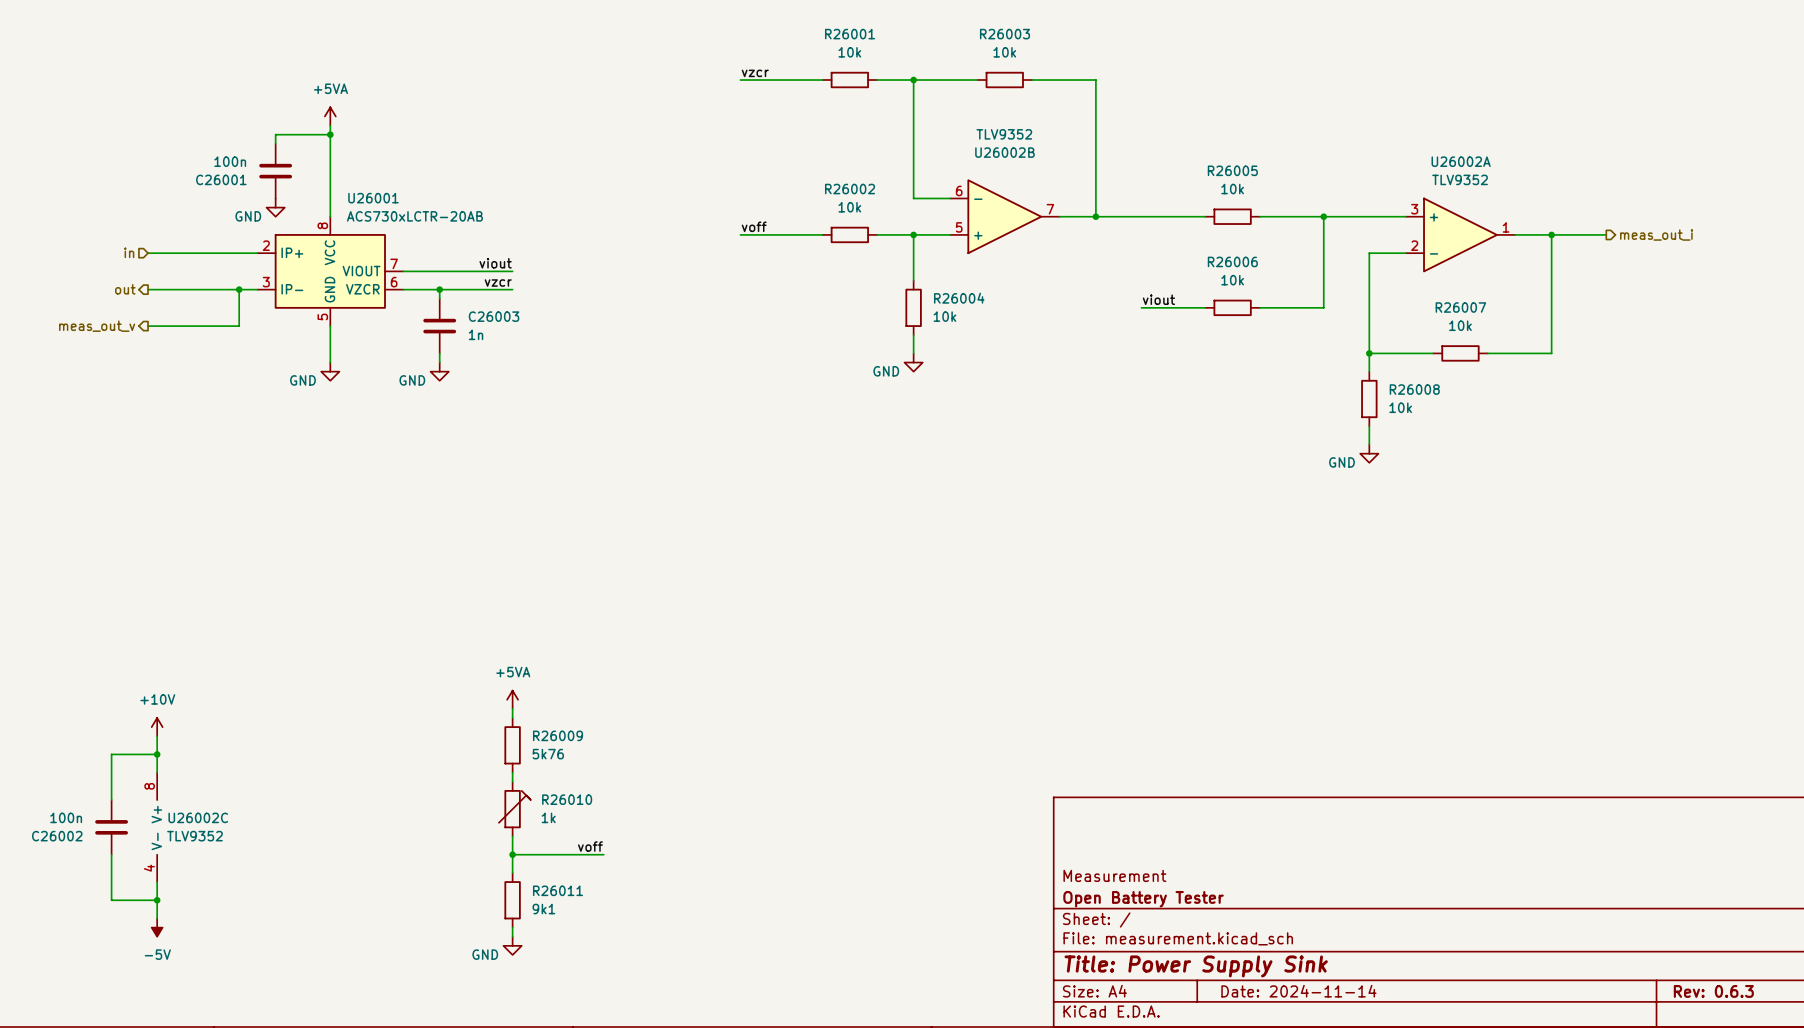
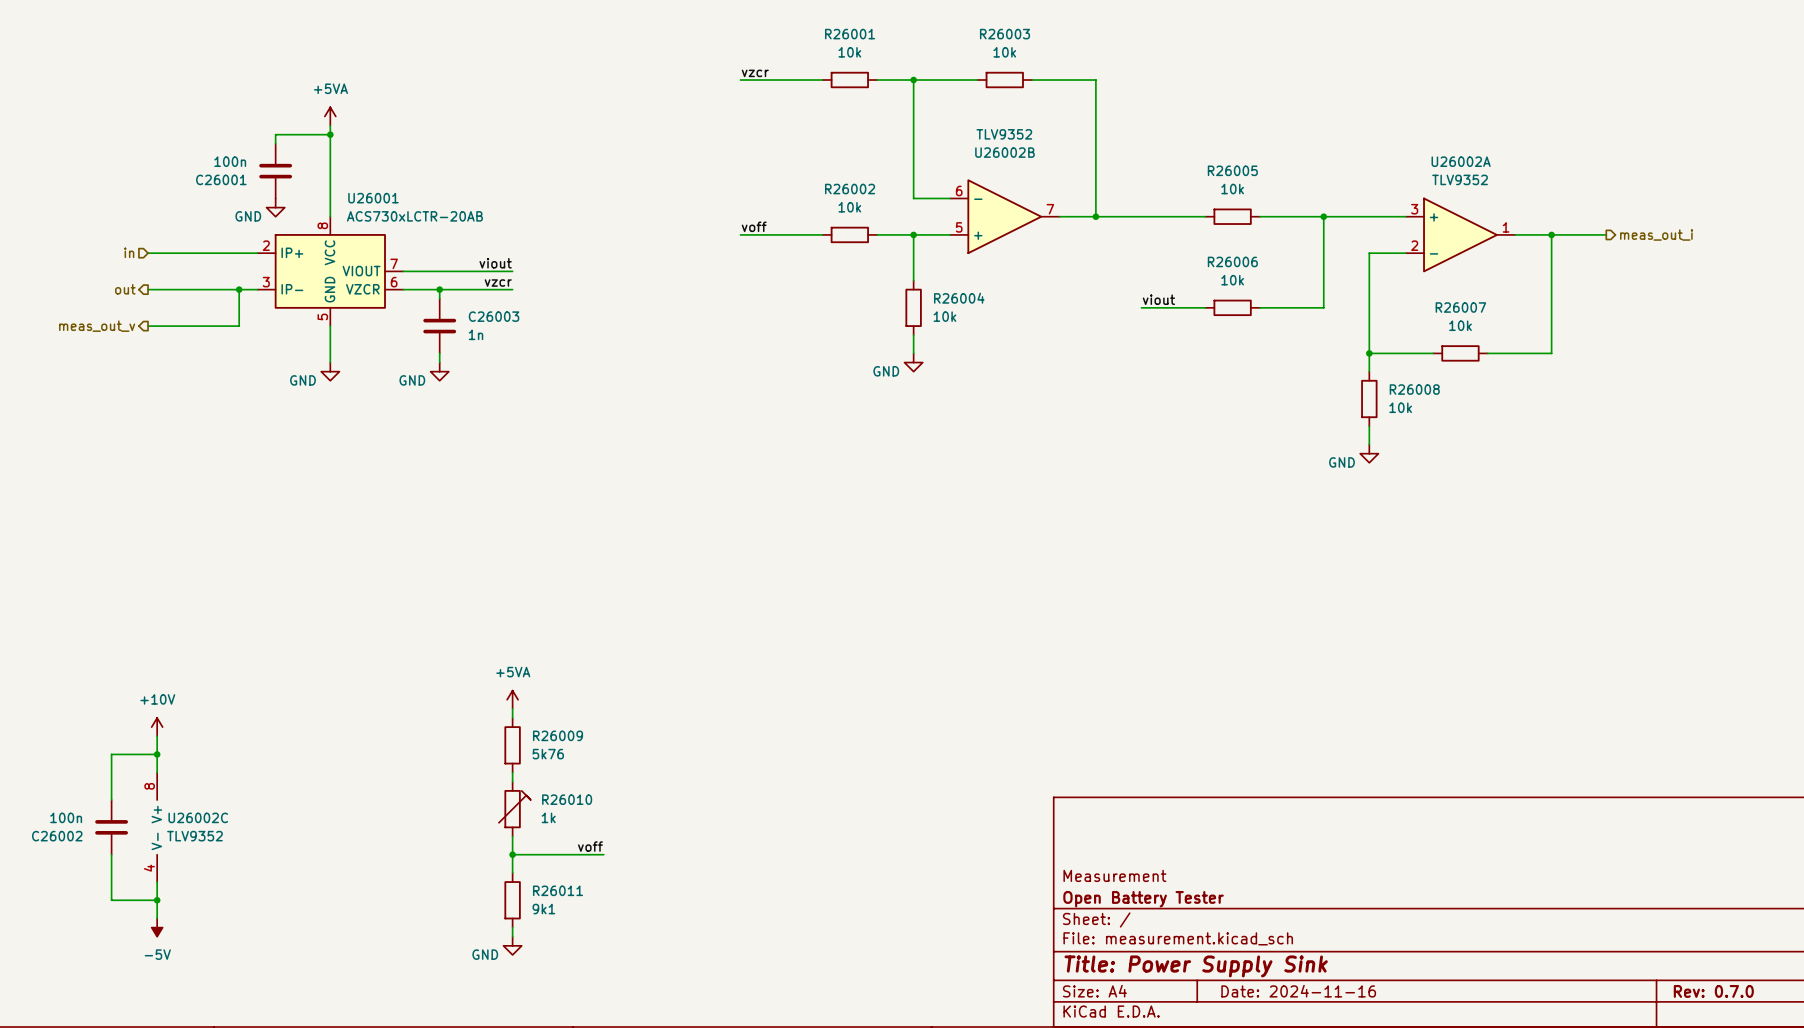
title block: Date: 2024-11-14 (1298, 991) -> Date: 2024-11-16 (1298, 991)
title block: Rev: 0.6.3 (1713, 991) -> Rev: 0.7.0 (1713, 991)

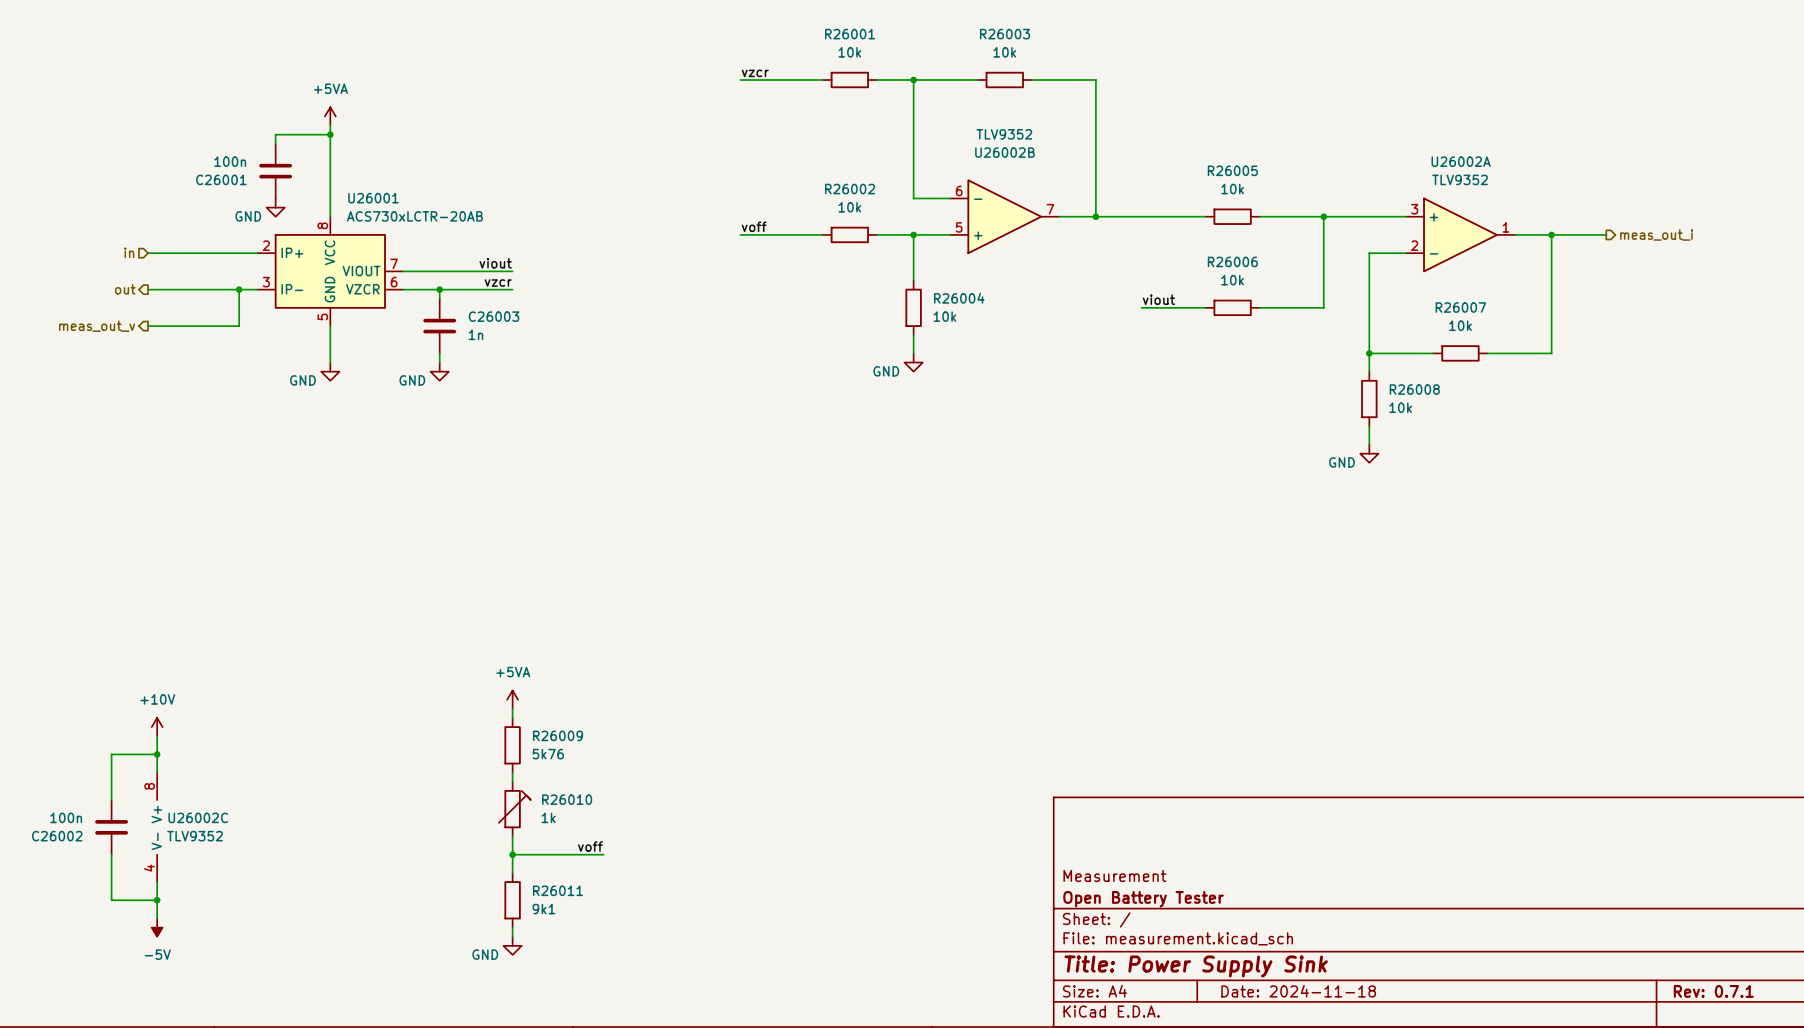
title block: Date: 2024-11-16 (1298, 991) -> Date: 2024-11-18 (1298, 991)
title block: Rev: 0.7.0 (1713, 991) -> Rev: 0.7.1 (1713, 991)

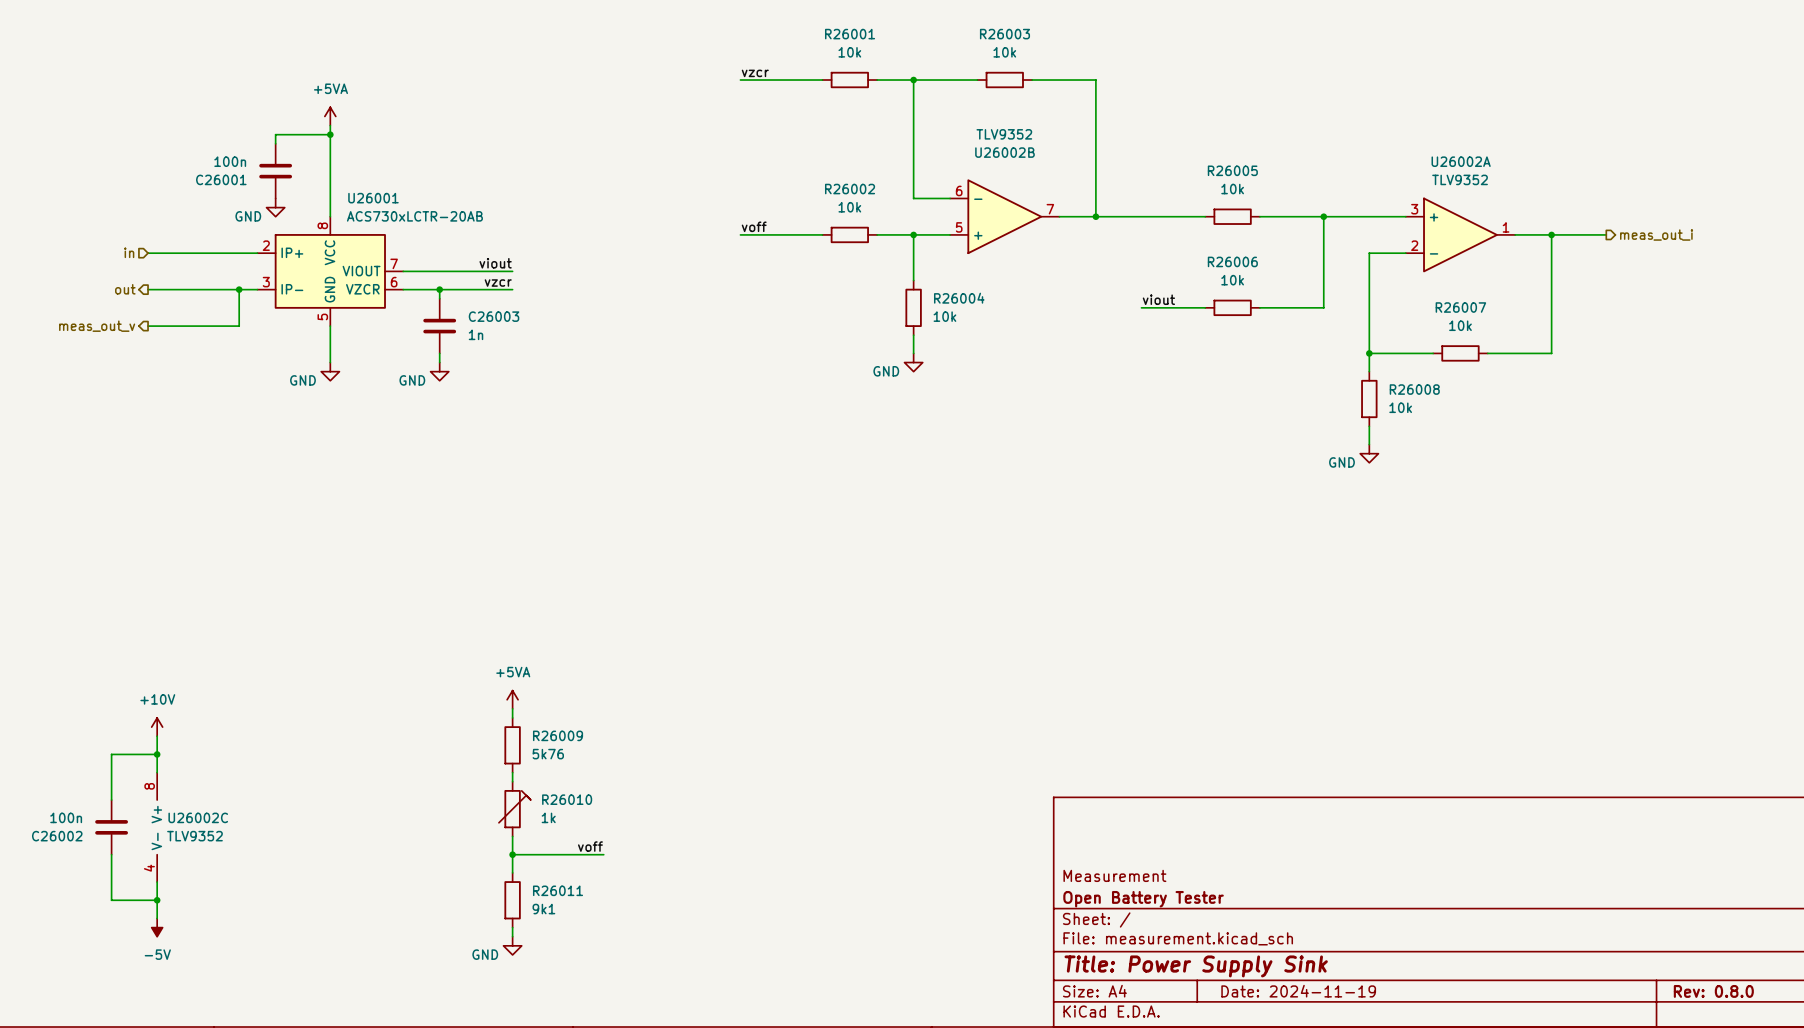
title block: Date: 2024-11-18 (1298, 991) -> Date: 2024-11-19 (1298, 991)
title block: Rev: 0.7.1 (1713, 991) -> Rev: 0.8.0 (1713, 991)

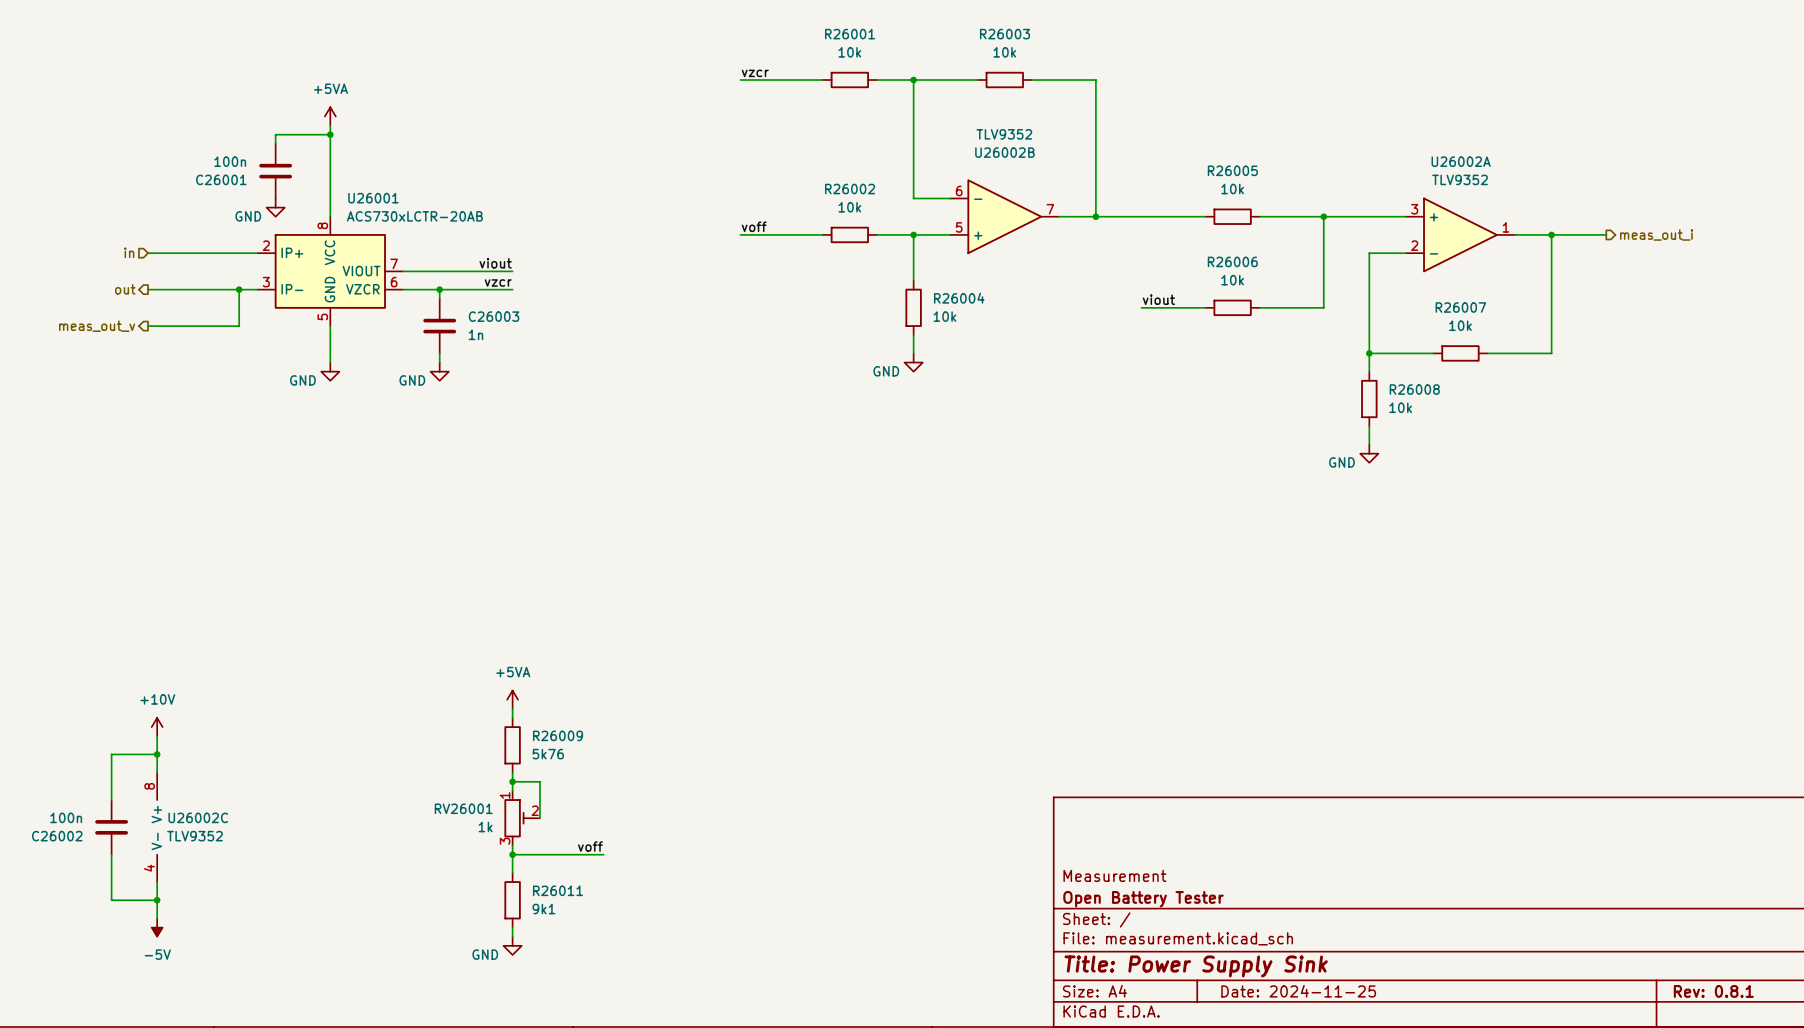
junction: none -> (512, 781)
wire: none -> (512, 790) (512, 781) (539, 781) (539, 818)
R26010: 1k (514, 809) -> none
RV26001: none -> 1k (522, 818)
title block: Date: 2024-11-19 (1298, 991) -> Date: 2024-11-25 (1298, 991)
title block: Rev: 0.8.0 (1713, 991) -> Rev: 0.8.1 (1713, 991)

